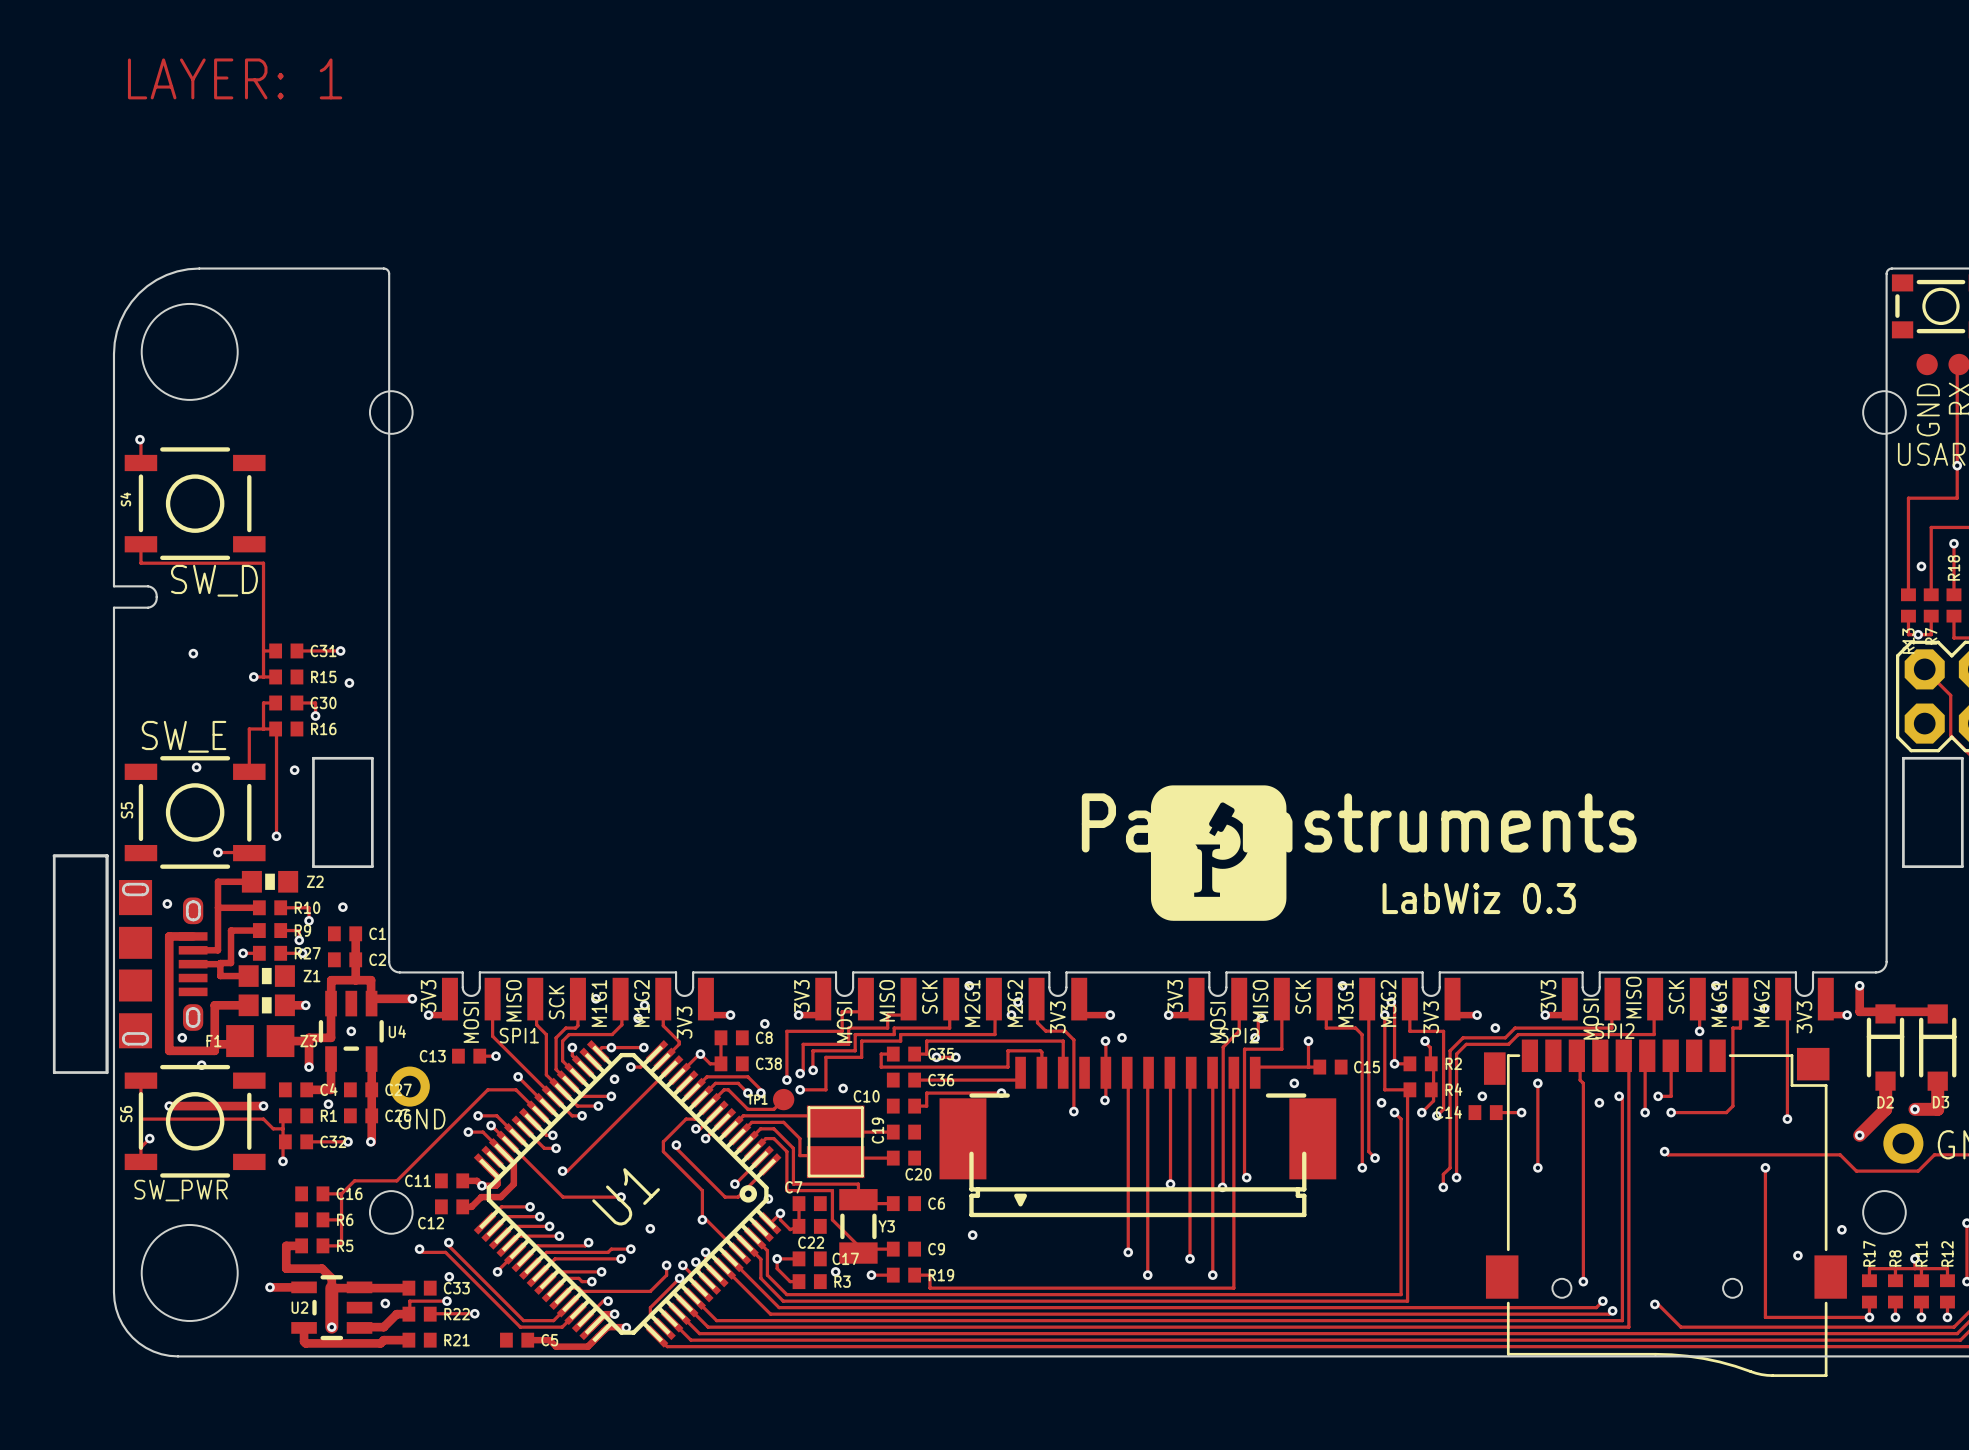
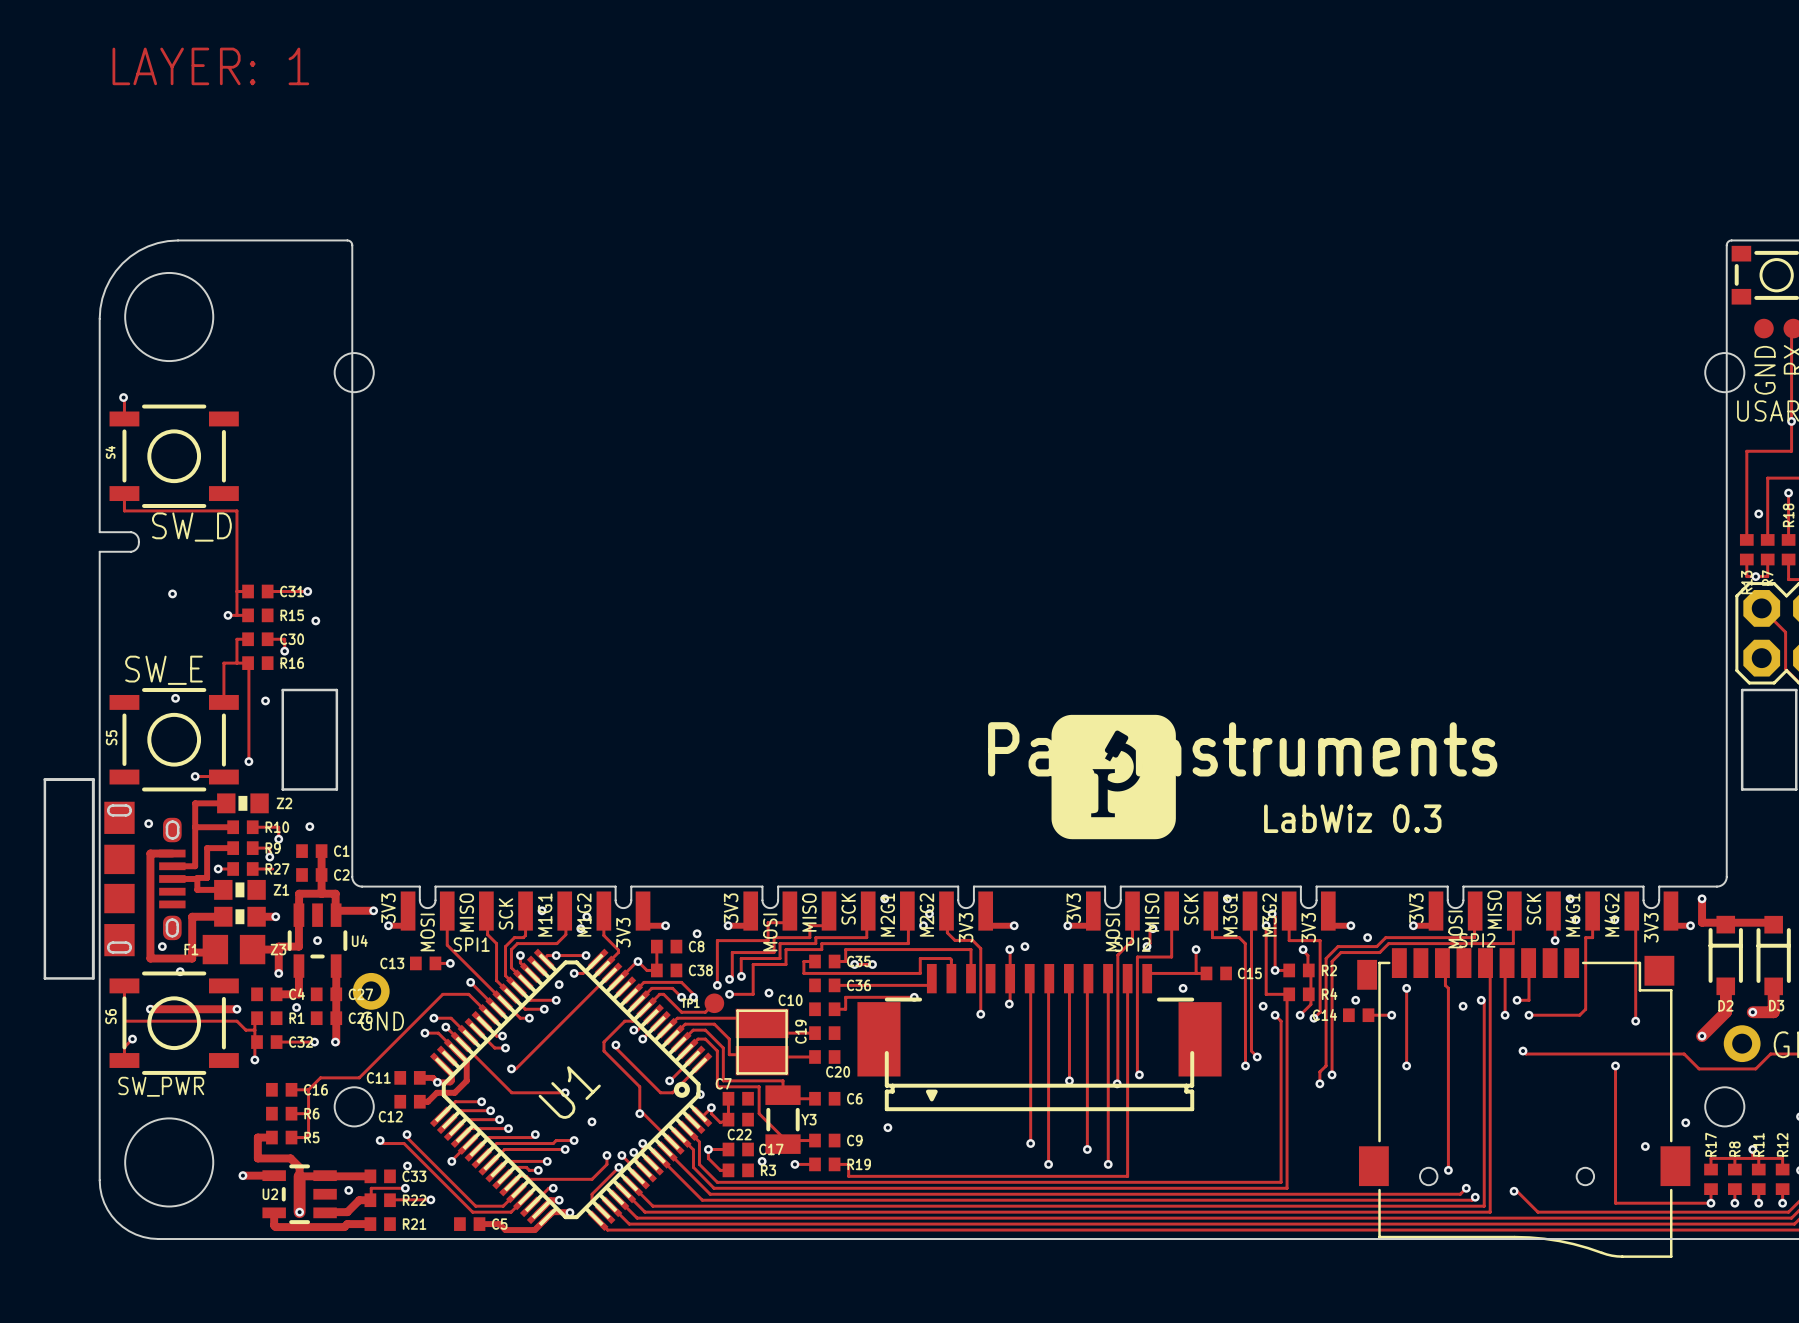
via: (302, 953) -> none

